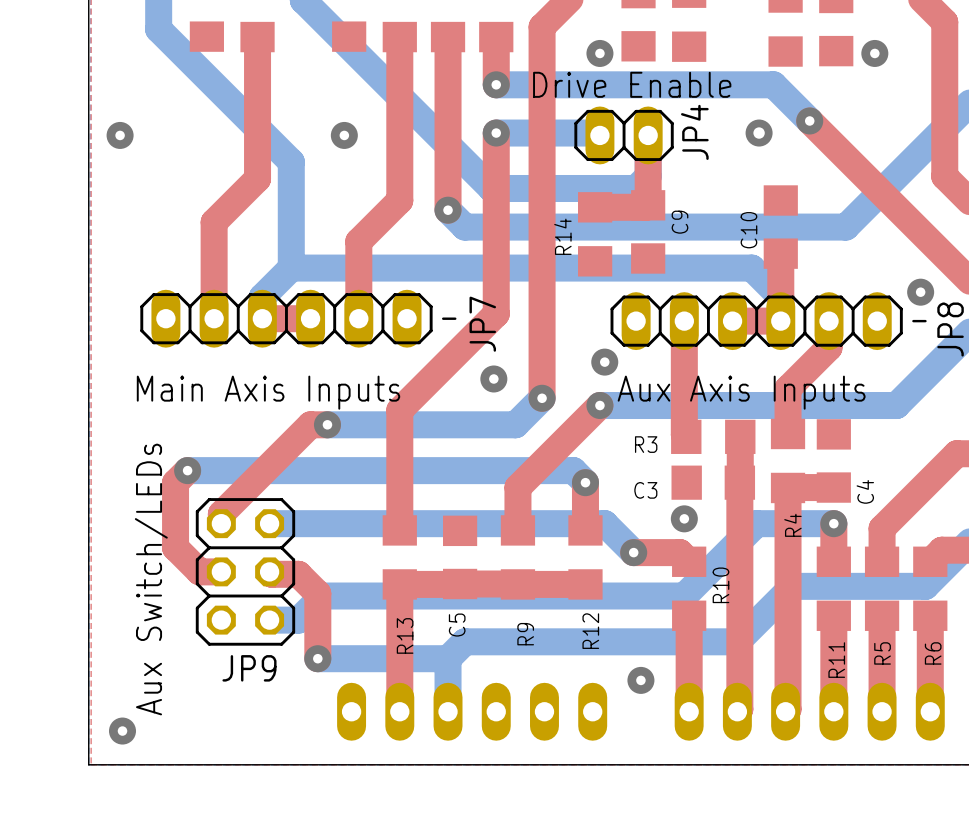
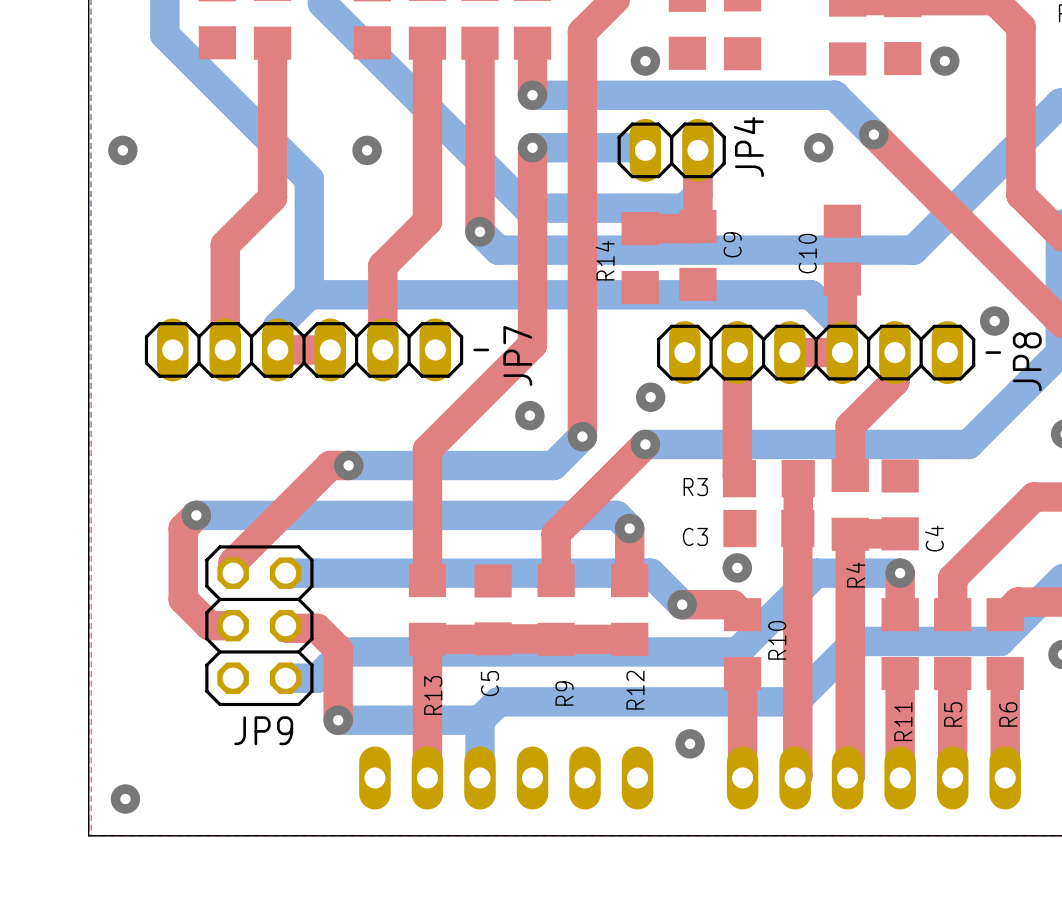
JP4 value: Drive Enable (632, 84) -> none
JP7 value: Main Axis Inputs (268, 392) -> none
JP8 value: Aux Axis Inputs (741, 392) -> none
JP9 value: Aux Switch/LEDs (151, 579) -> none

